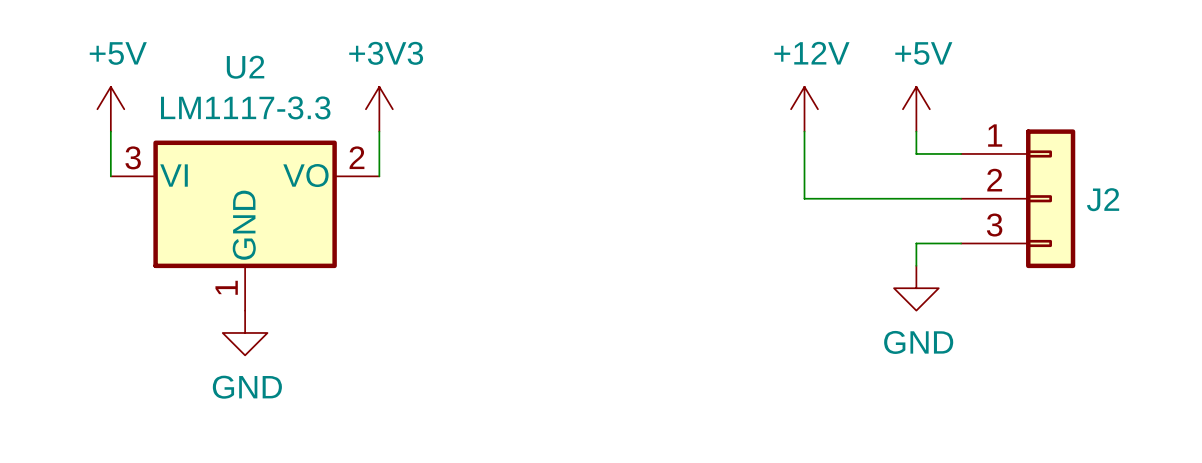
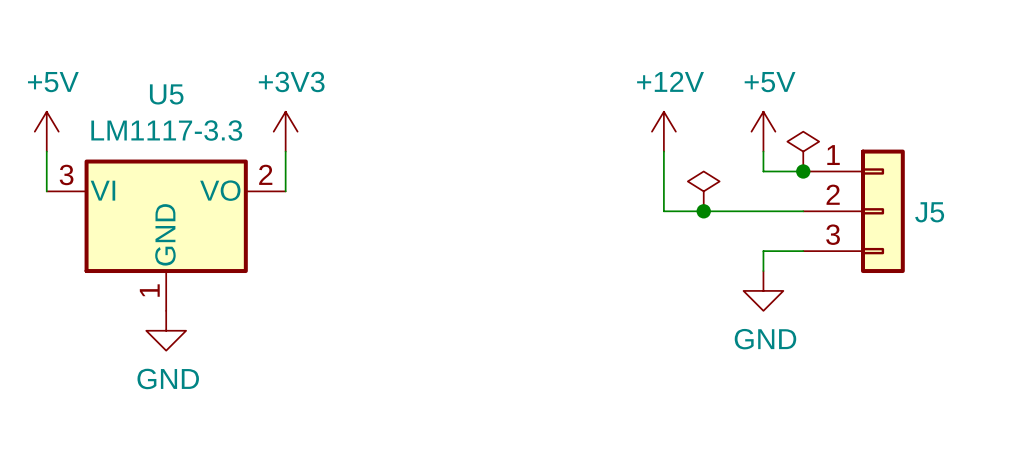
U2 name: U2 (245, 67) -> U5 (166, 94)
power symbol: none -> (803, 151)
junction: none -> (803, 171)
power symbol: none -> (703, 191)
junction: none -> (703, 211)
J2 name: J2 (1103, 199) -> J5 (929, 212)

